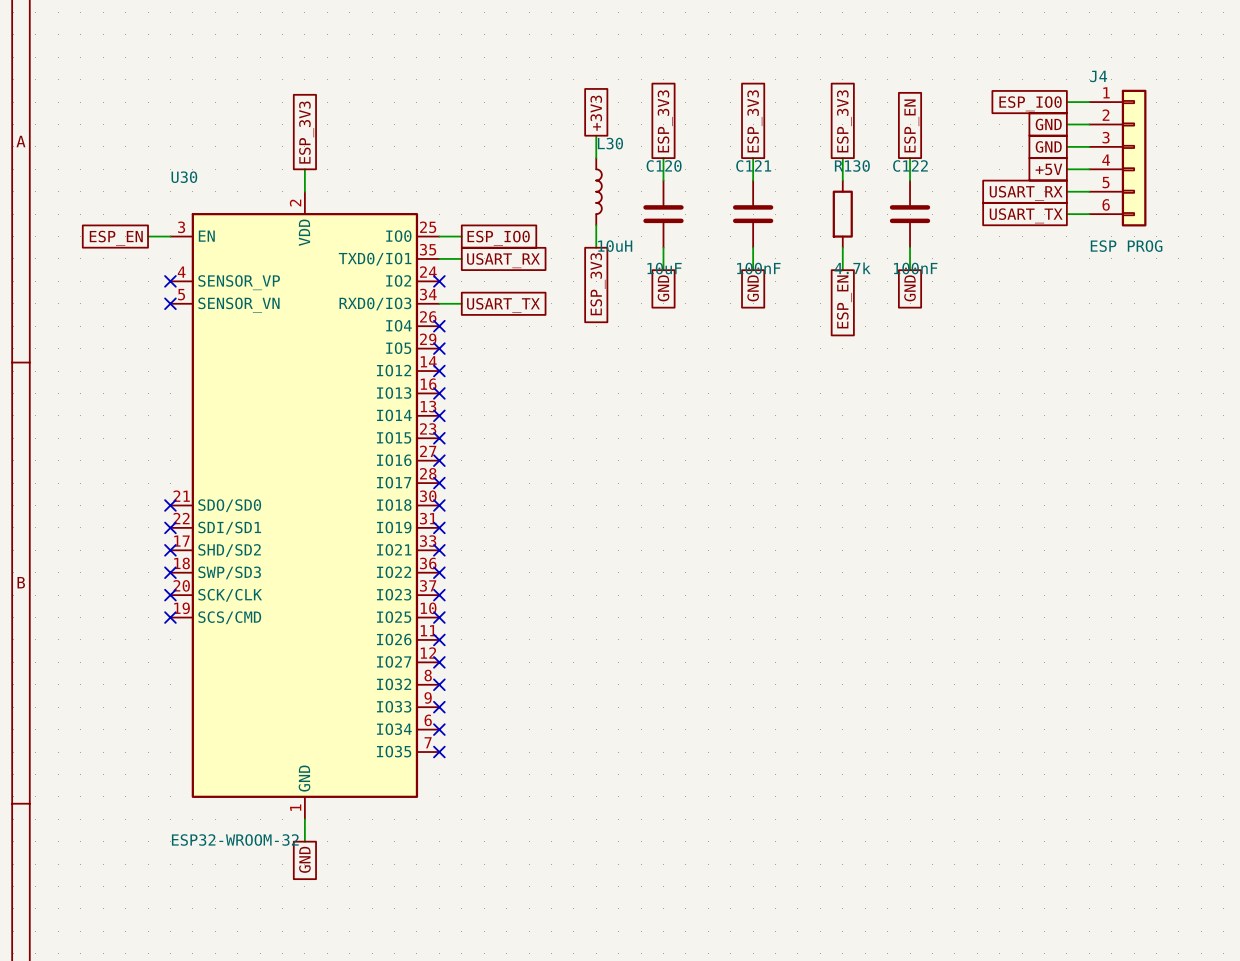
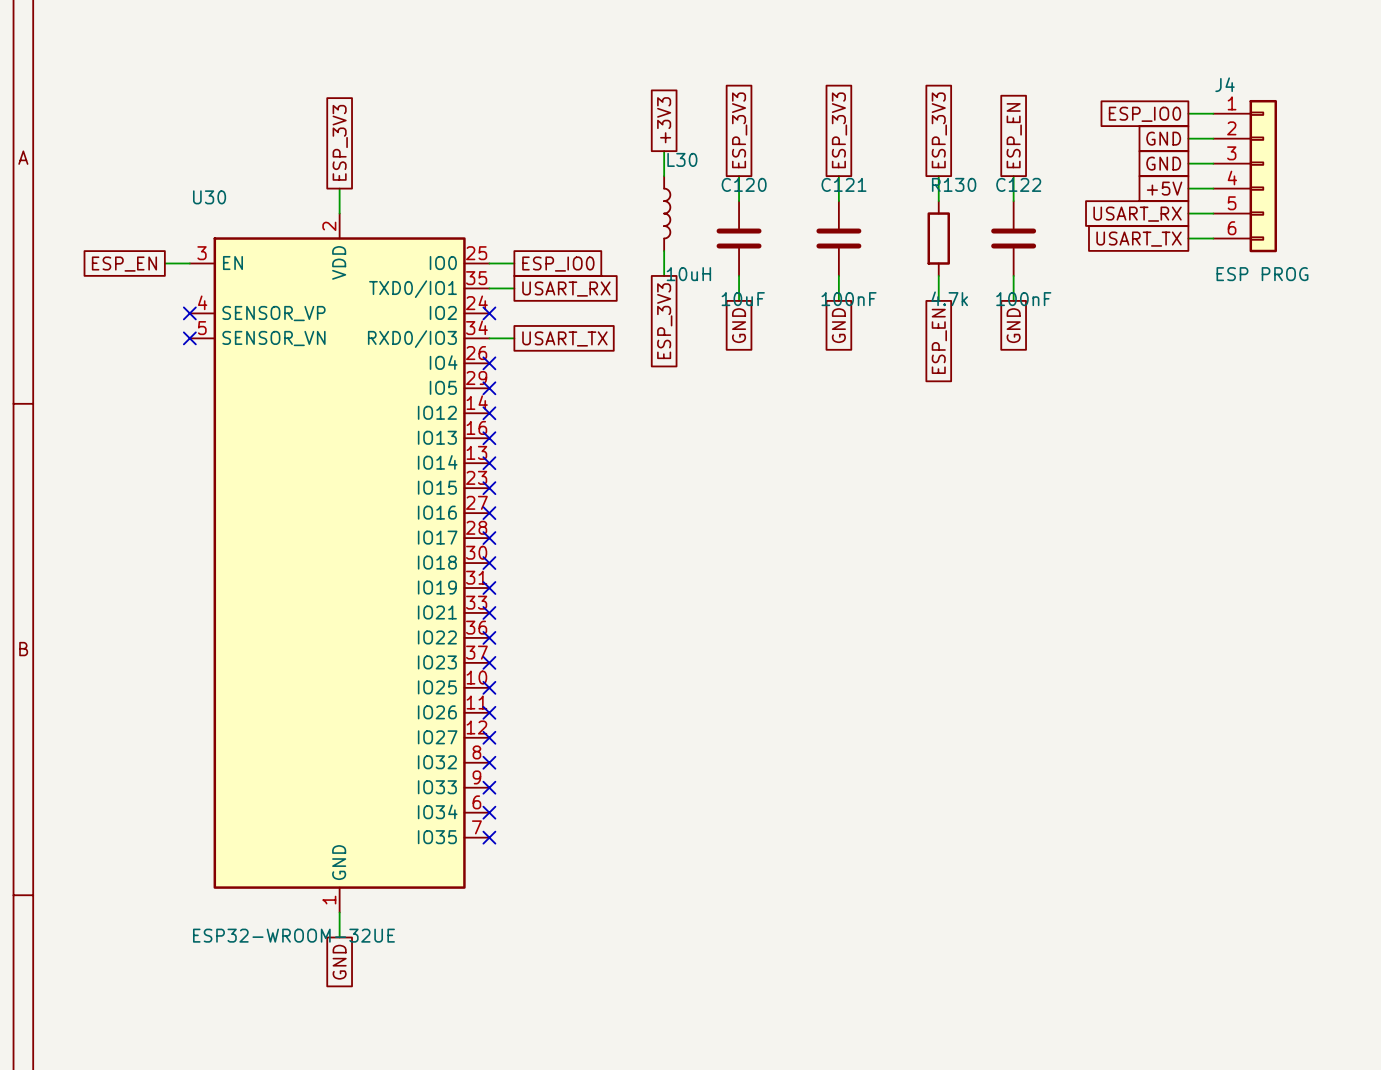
U30 symbol: [170, 191, 440, 820] -> [189, 213, 490, 913]
no-connect mark: (170, 505) -> none
no-connect mark: (170, 527) -> none
no-connect mark: (170, 550) -> none
no-connect mark: (170, 572) -> none
no-connect mark: (170, 595) -> none
no-connect mark: (170, 617) -> none
U30 value: ESP32-WROOM-32 (235, 840) -> ESP32-WROOM-32UE (293, 935)

